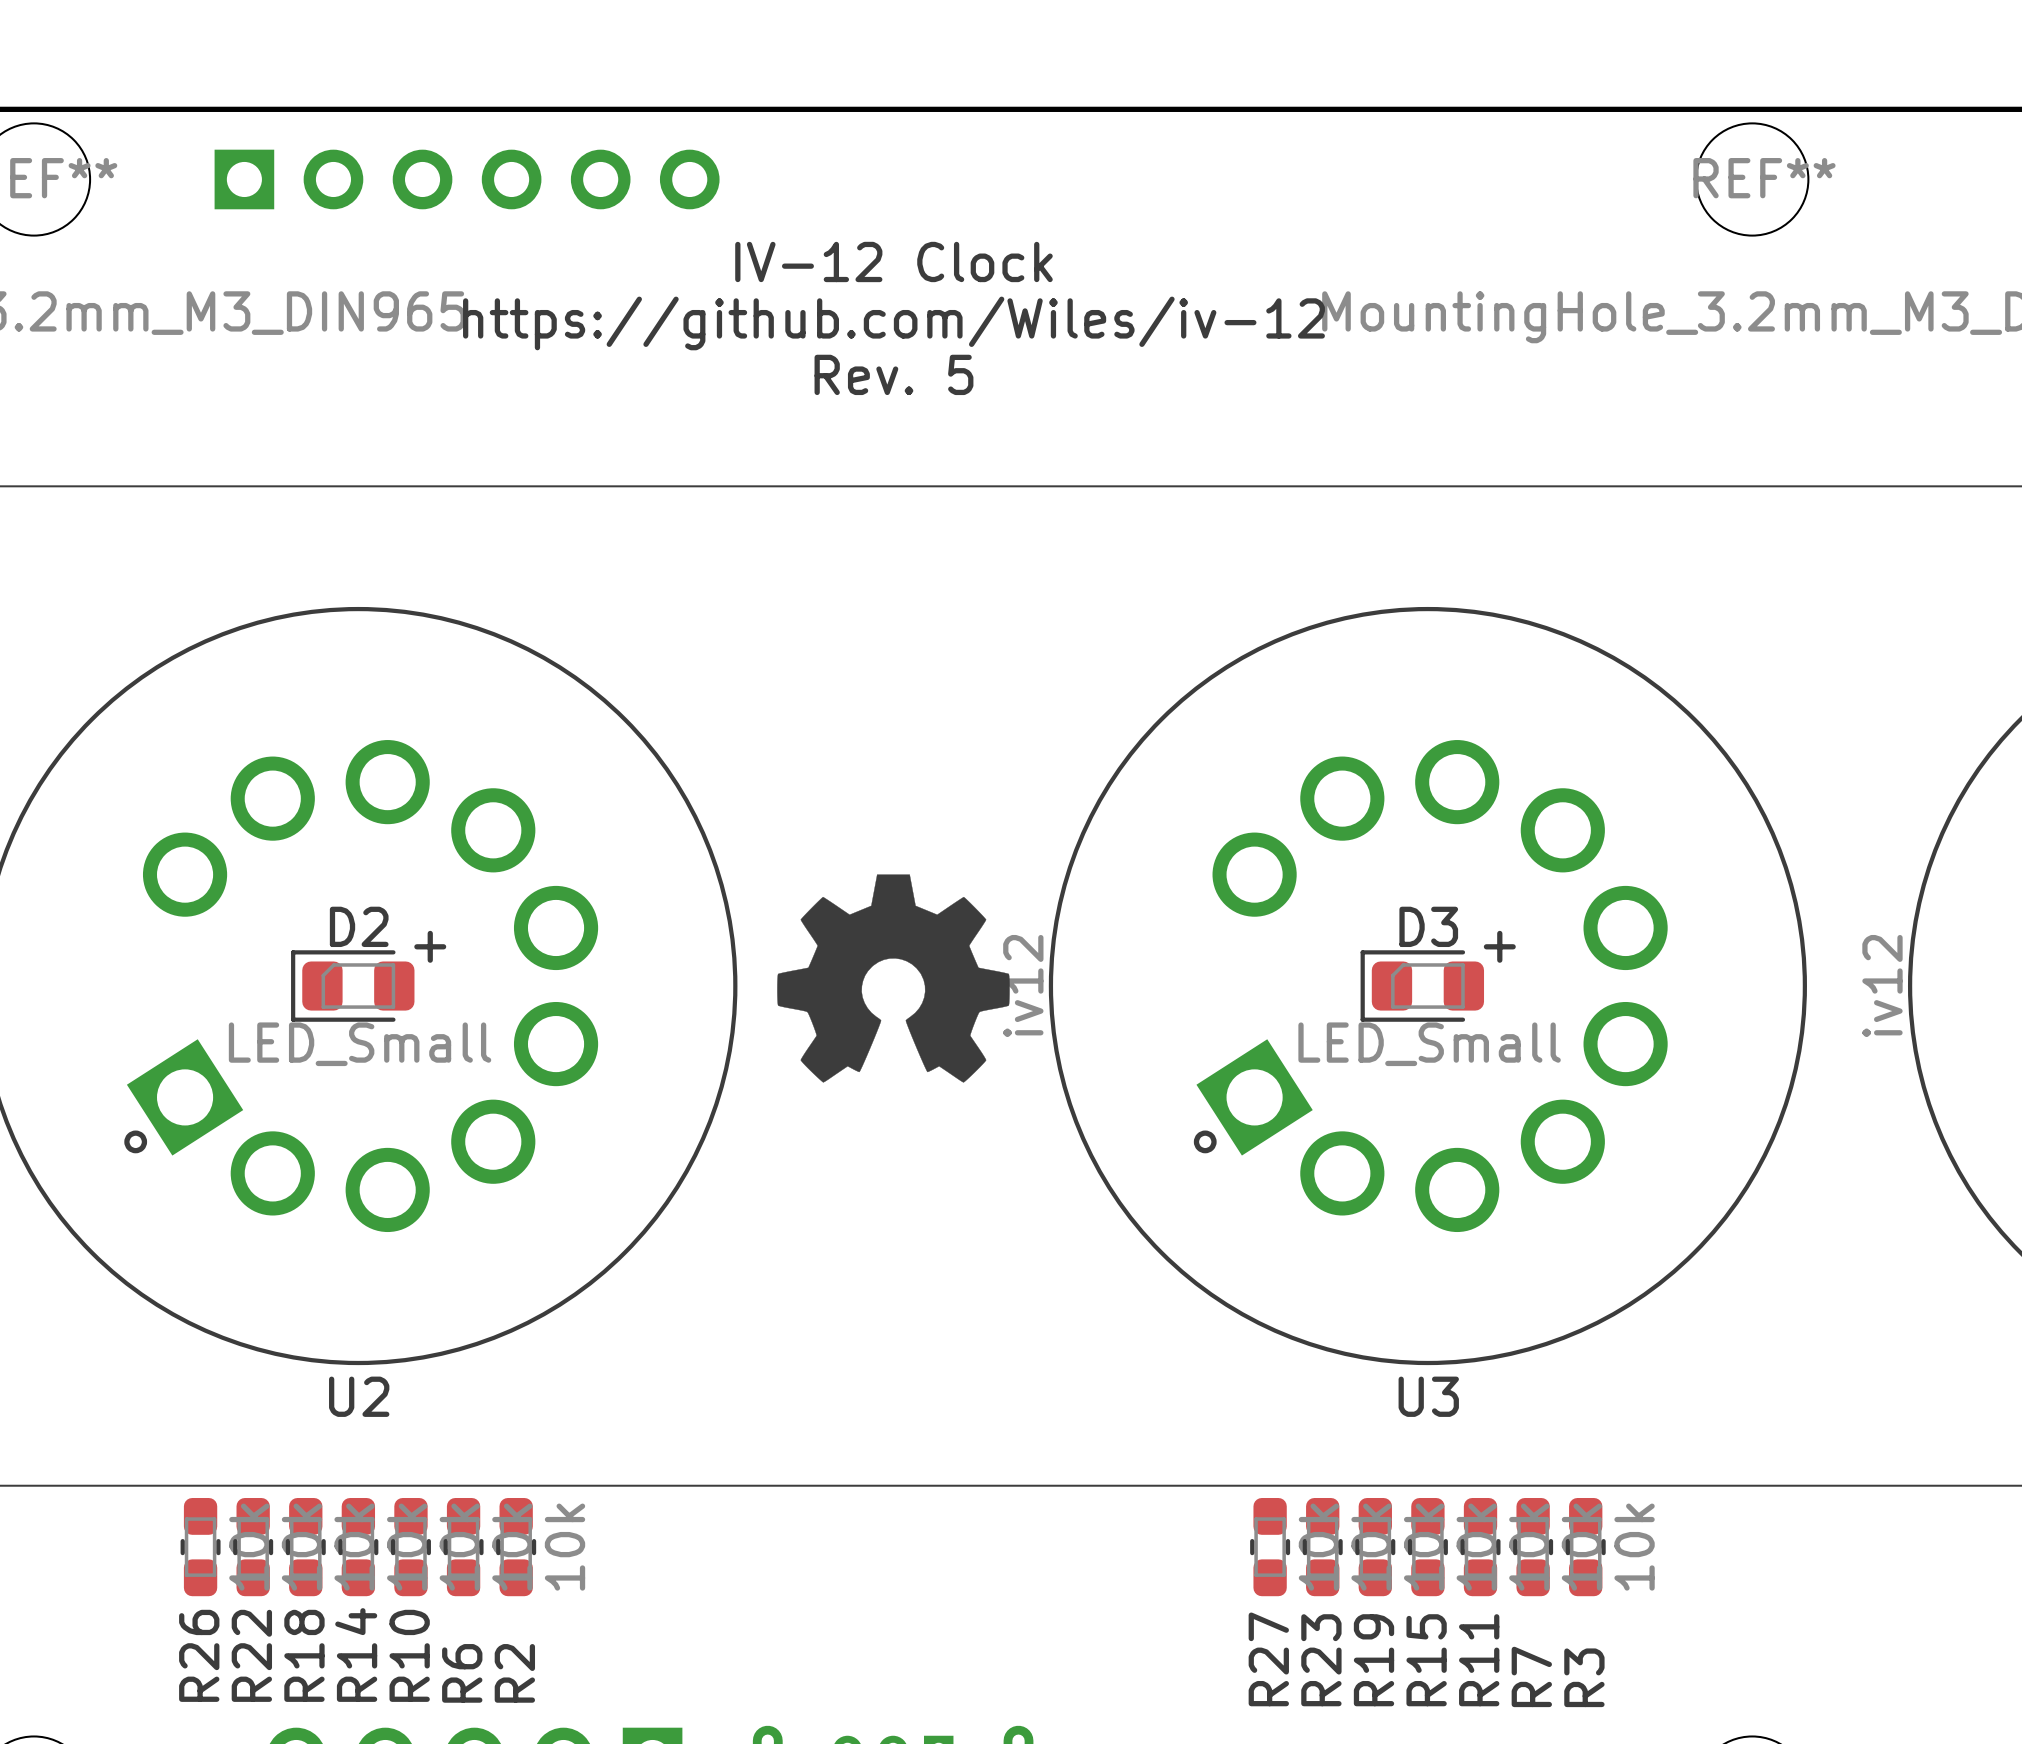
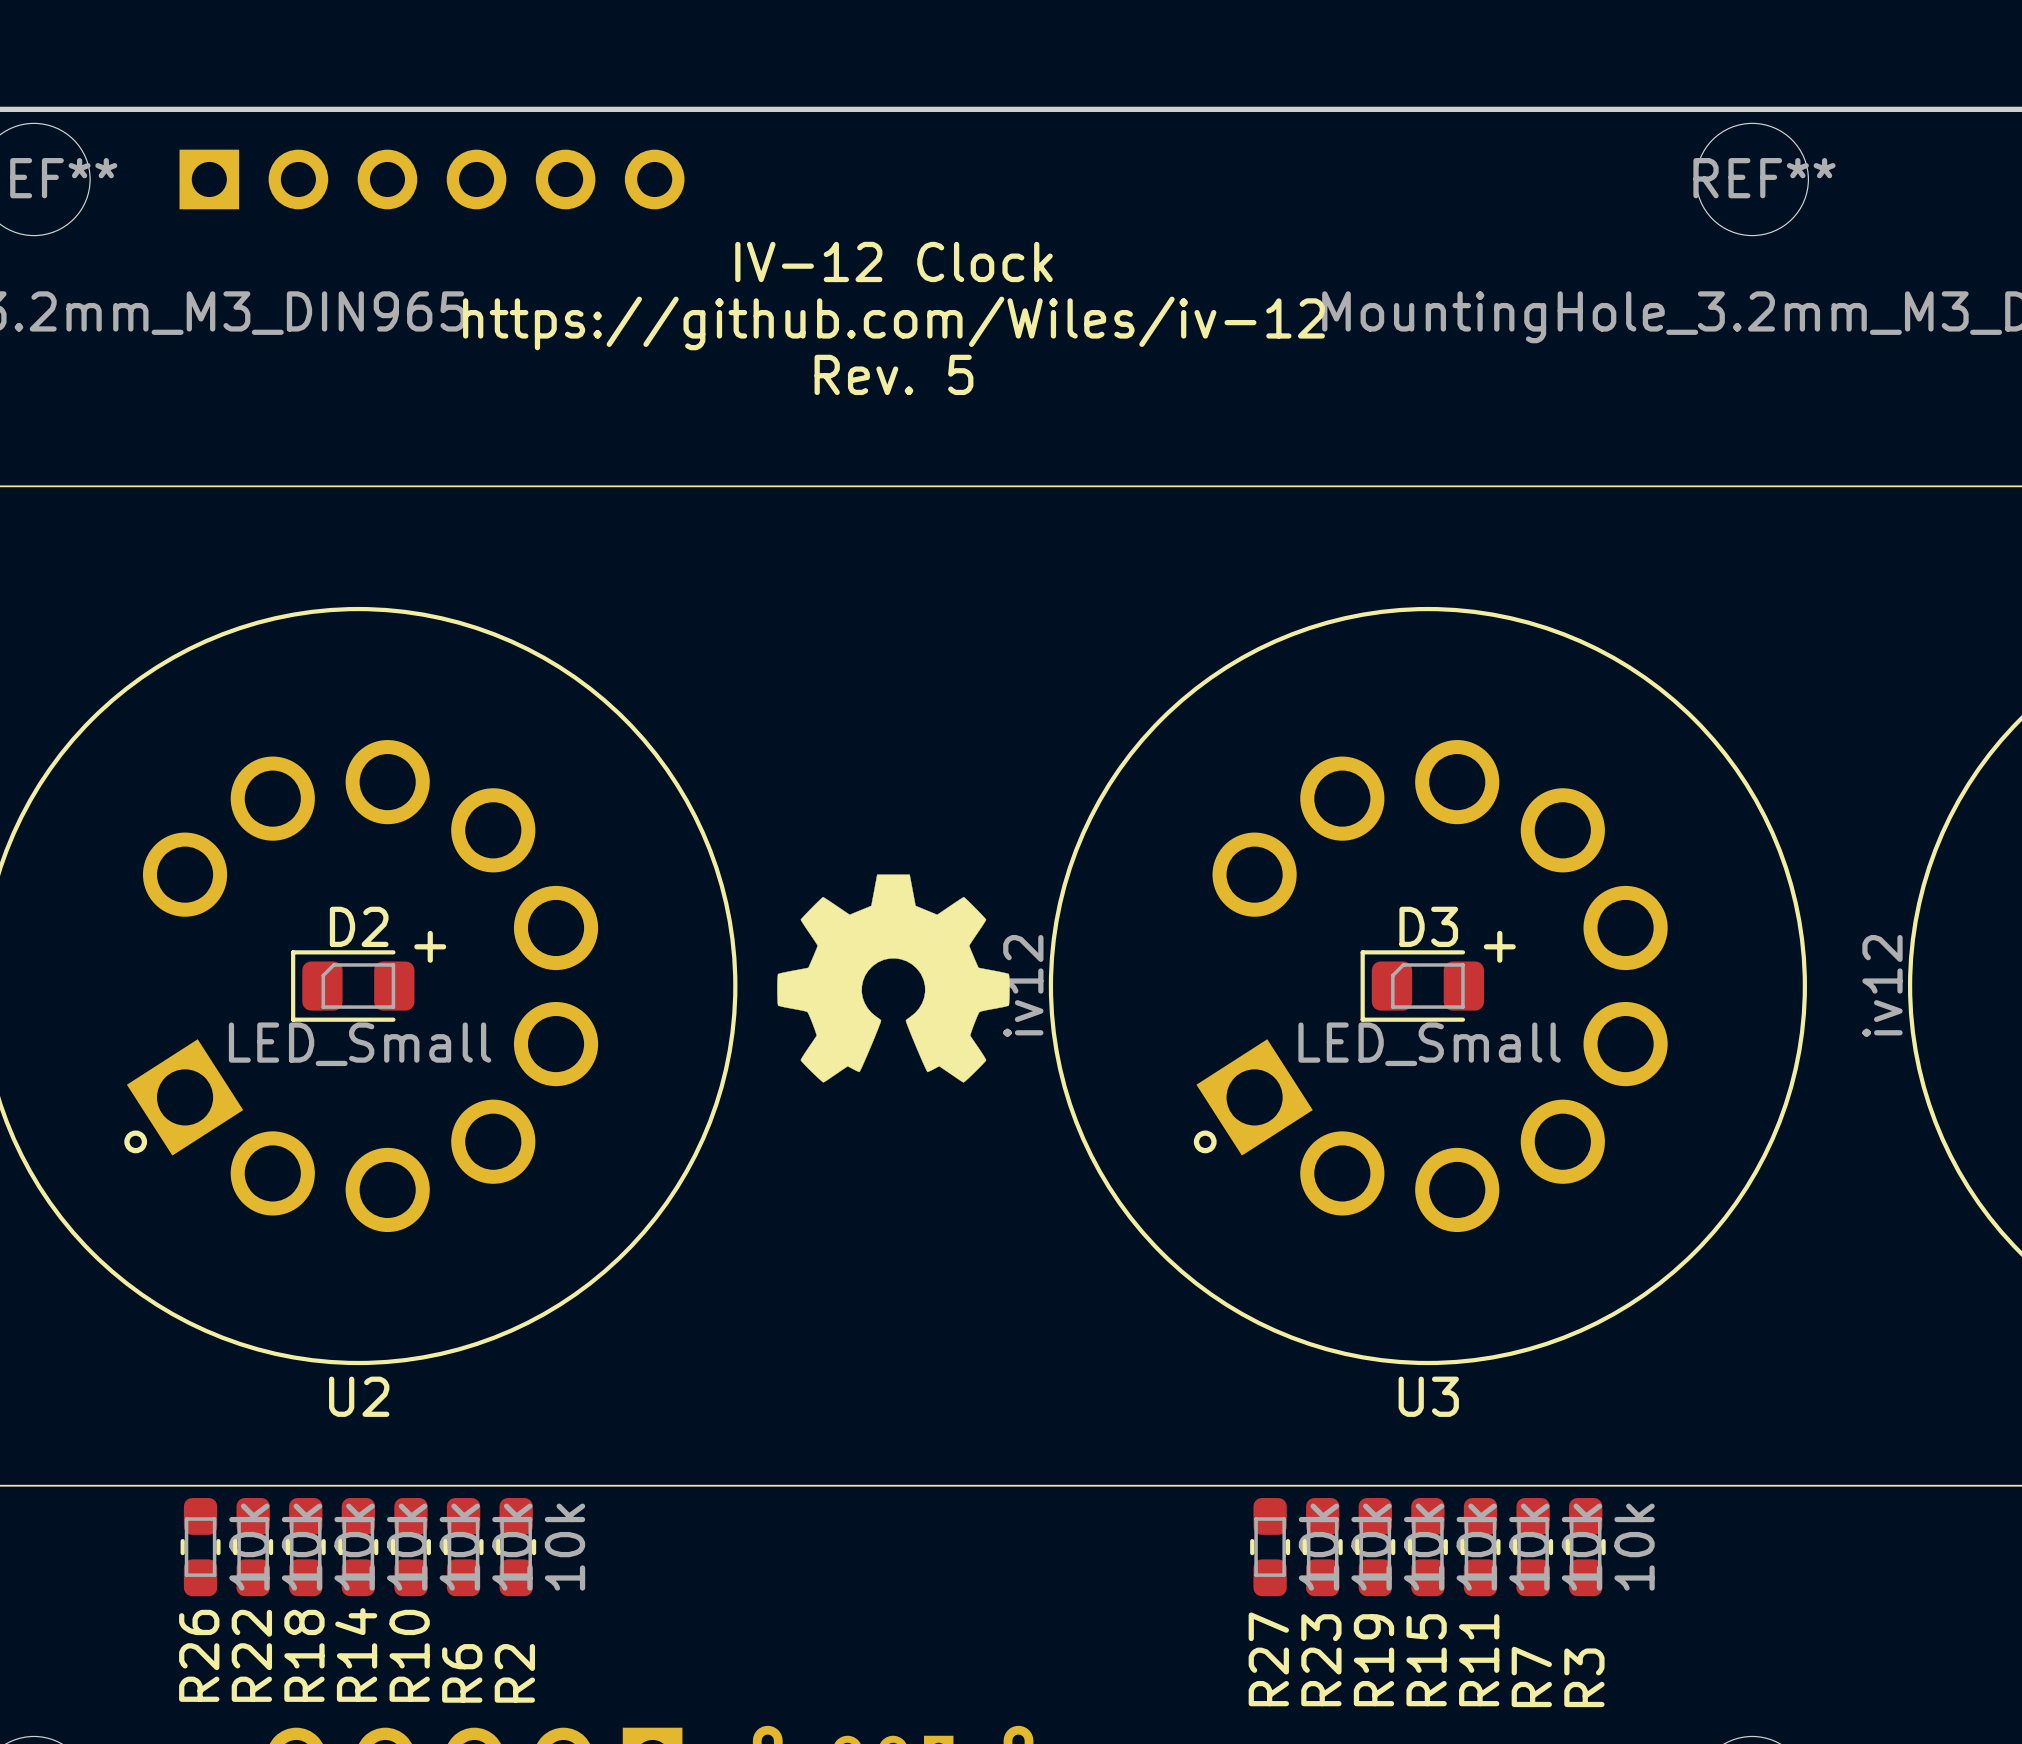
part position: (467, 179) -> (432, 179)

